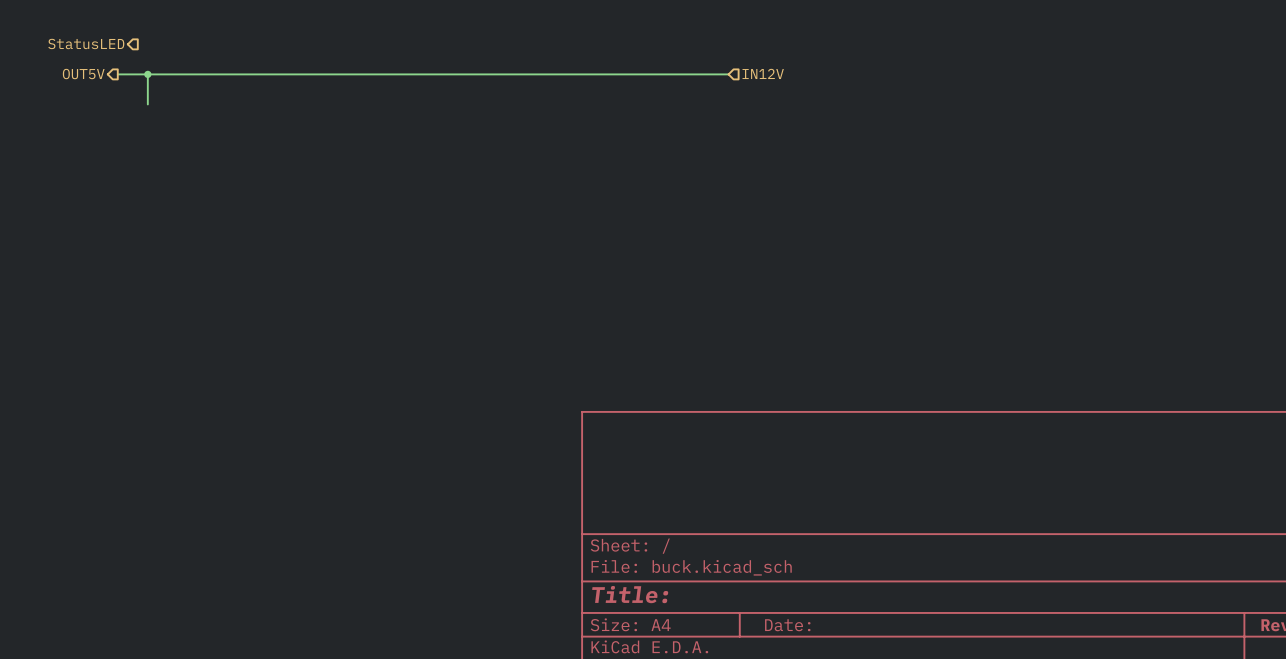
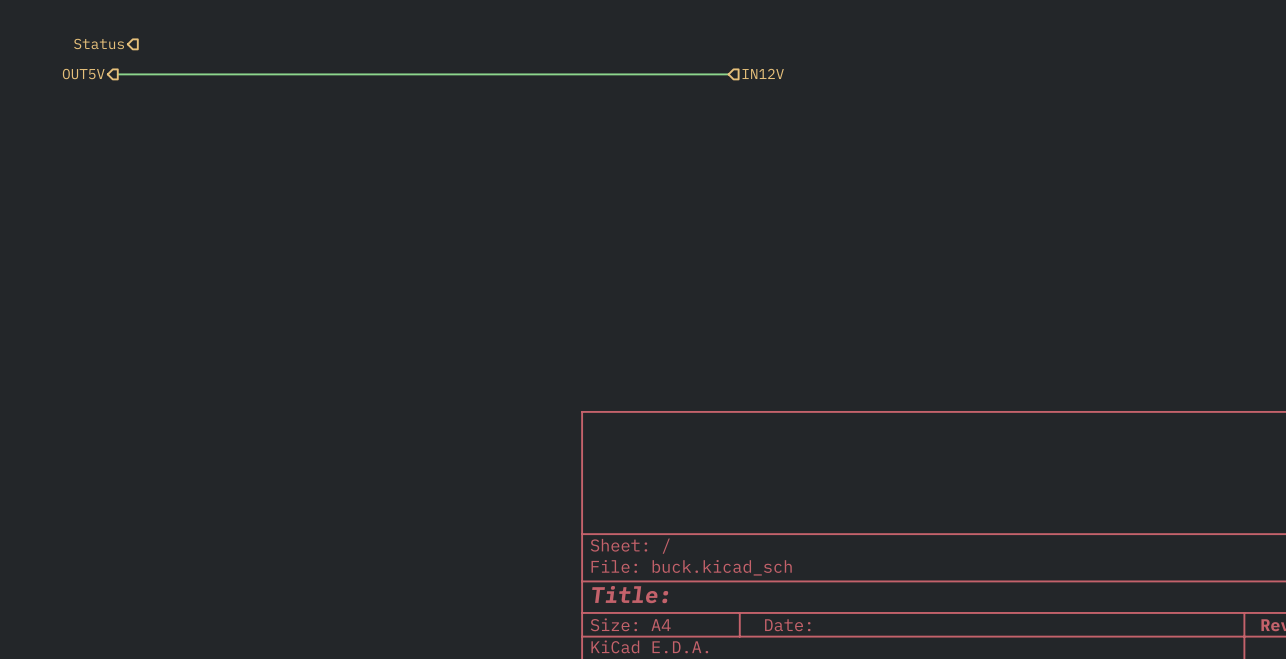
hierarchical label: StatusLED (86, 43) -> Status (99, 43)
wire: (147, 74) (147, 104) -> none
junction: (147, 74) -> none

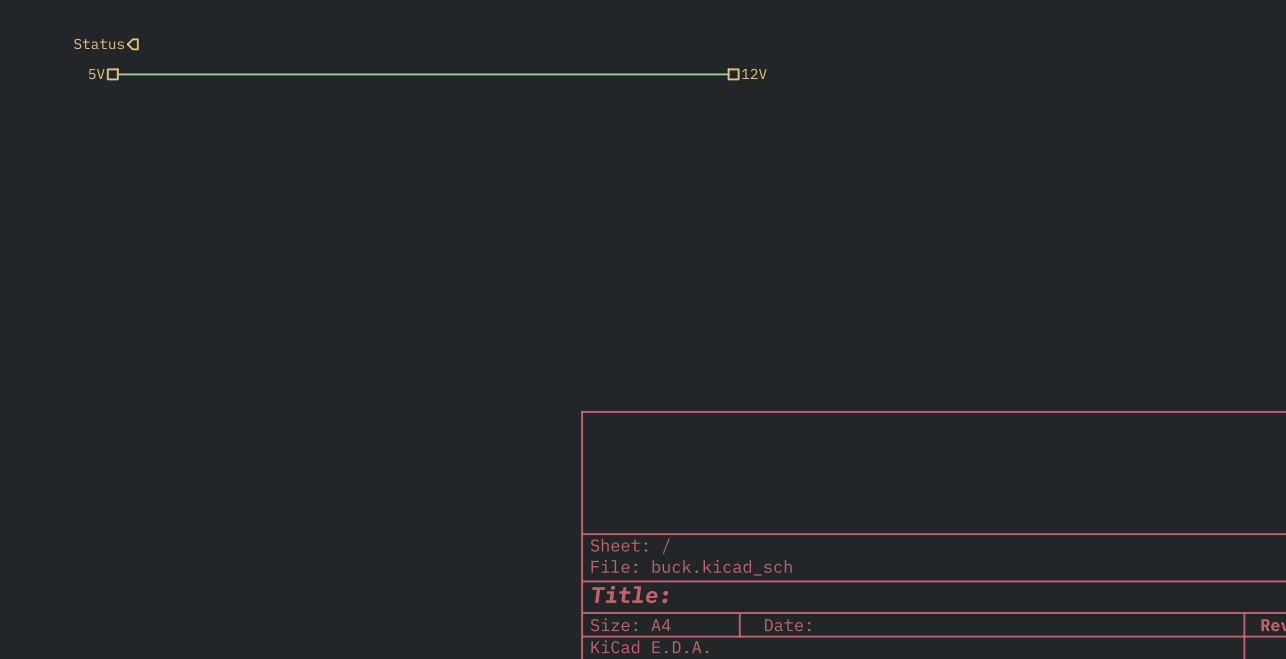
hierarchical label shape: input (763, 73) -> passive (754, 73)
hierarchical label: IN12V (763, 73) -> 12V (754, 73)
hierarchical label shape: output (83, 74) -> passive (96, 74)
hierarchical label: OUT5V (83, 74) -> 5V (96, 74)

